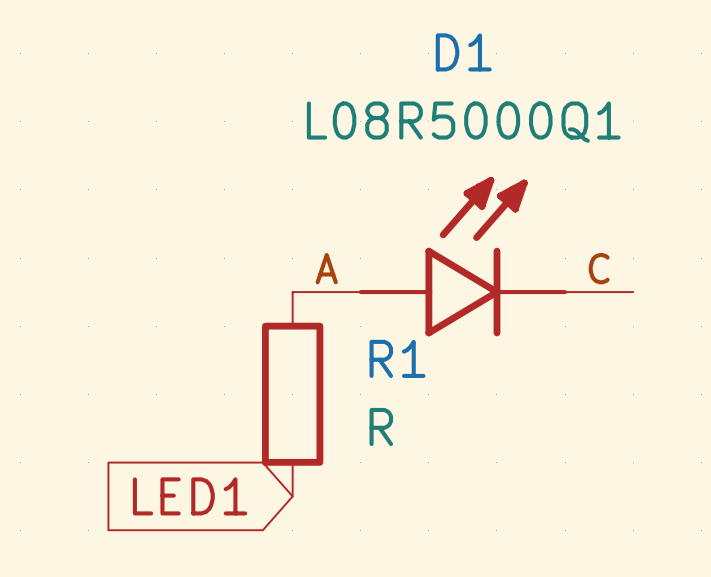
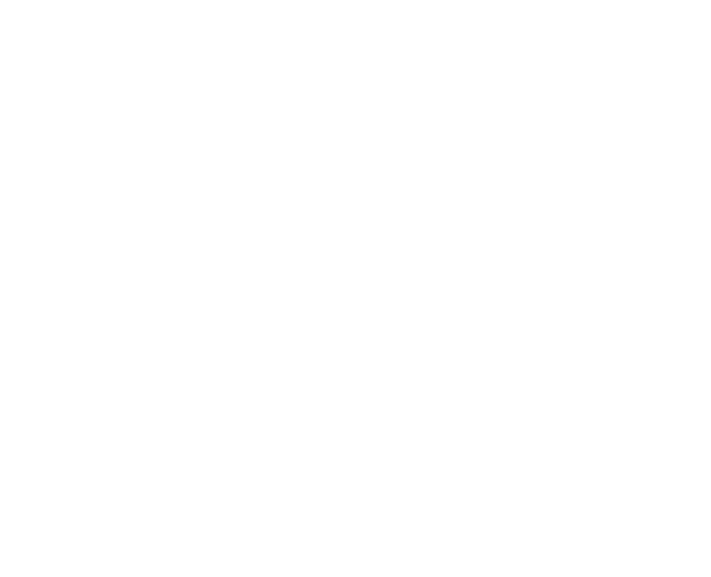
D1: L08R5000Q1 (462, 256) -> none
R1: R (292, 394) -> none
global label: LED1 (190, 496) -> none

